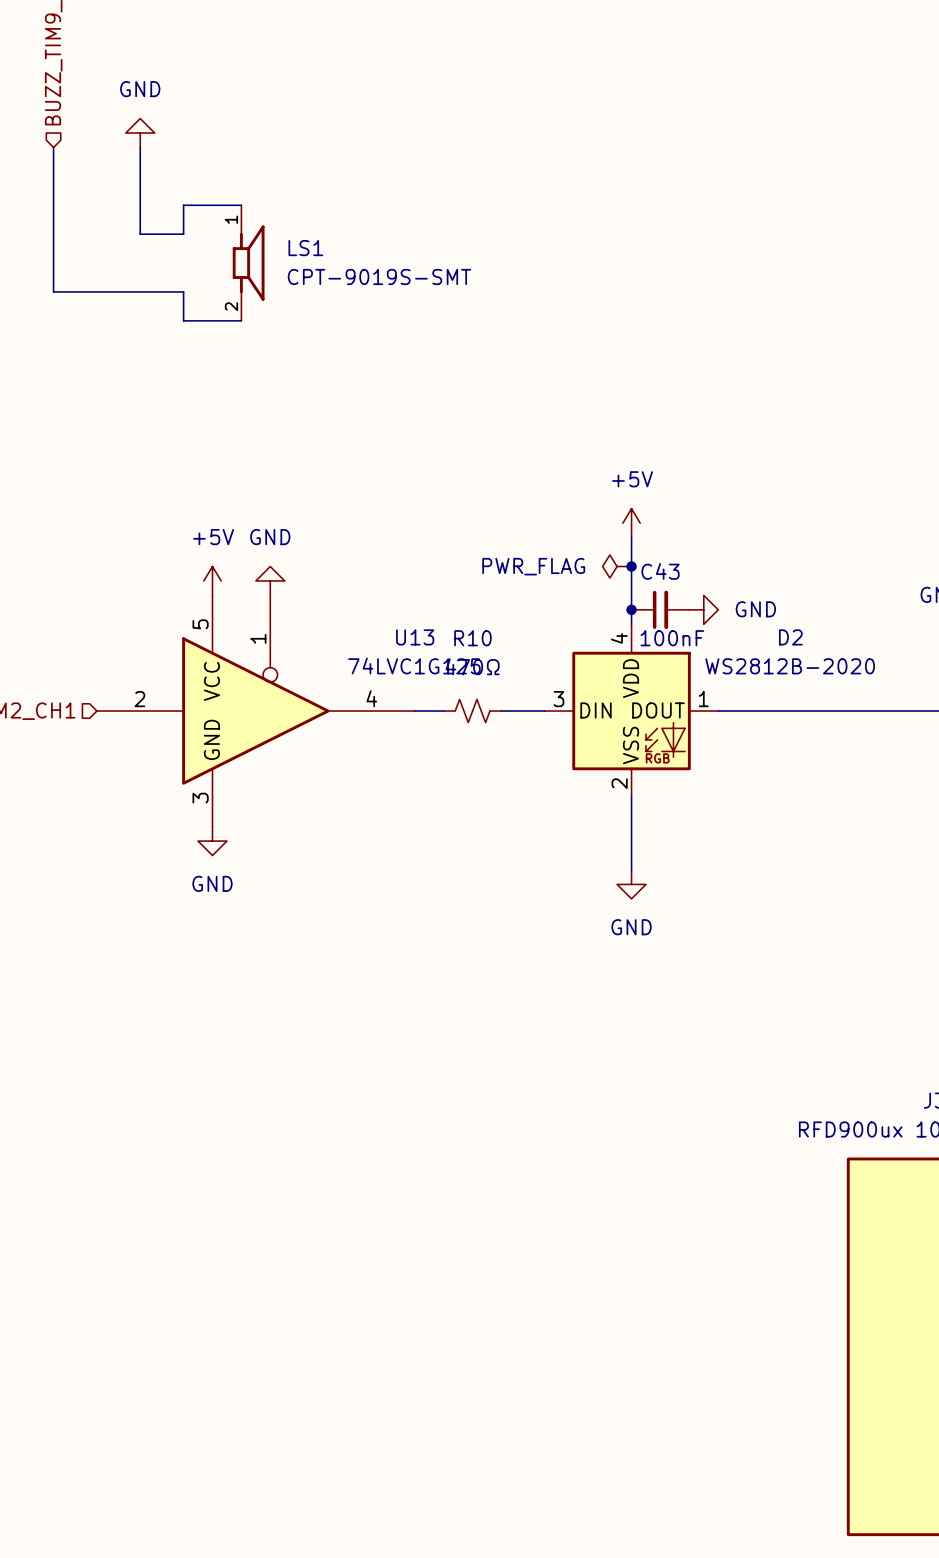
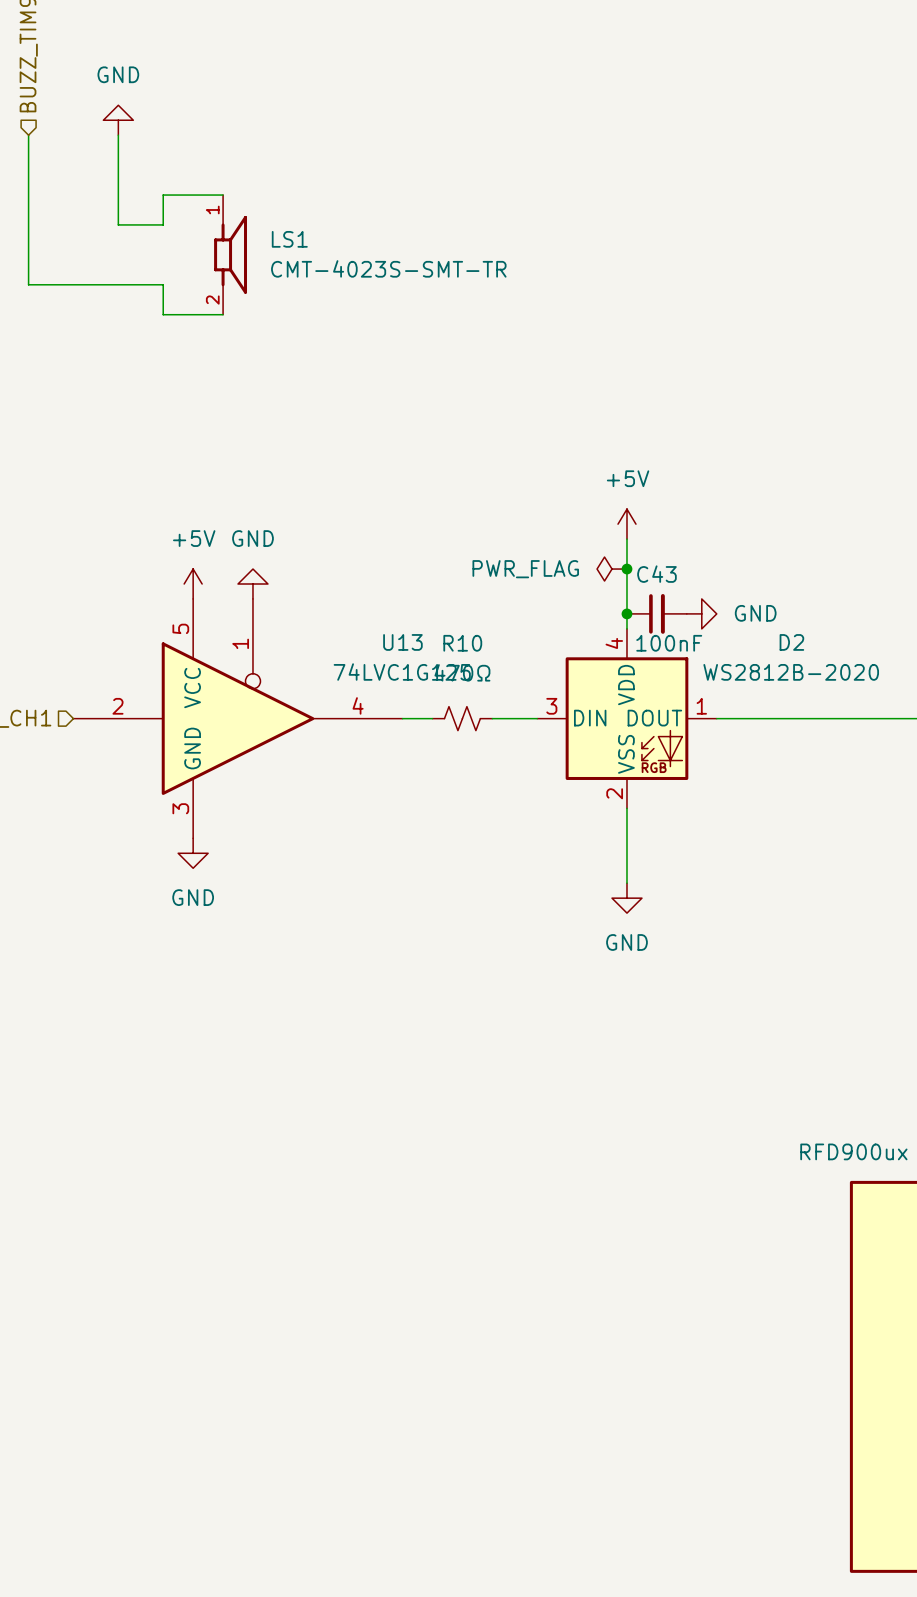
LS1 value: CPT-9019S-SMT (379, 276) -> CMT-4023S-SMT-TR (388, 268)

